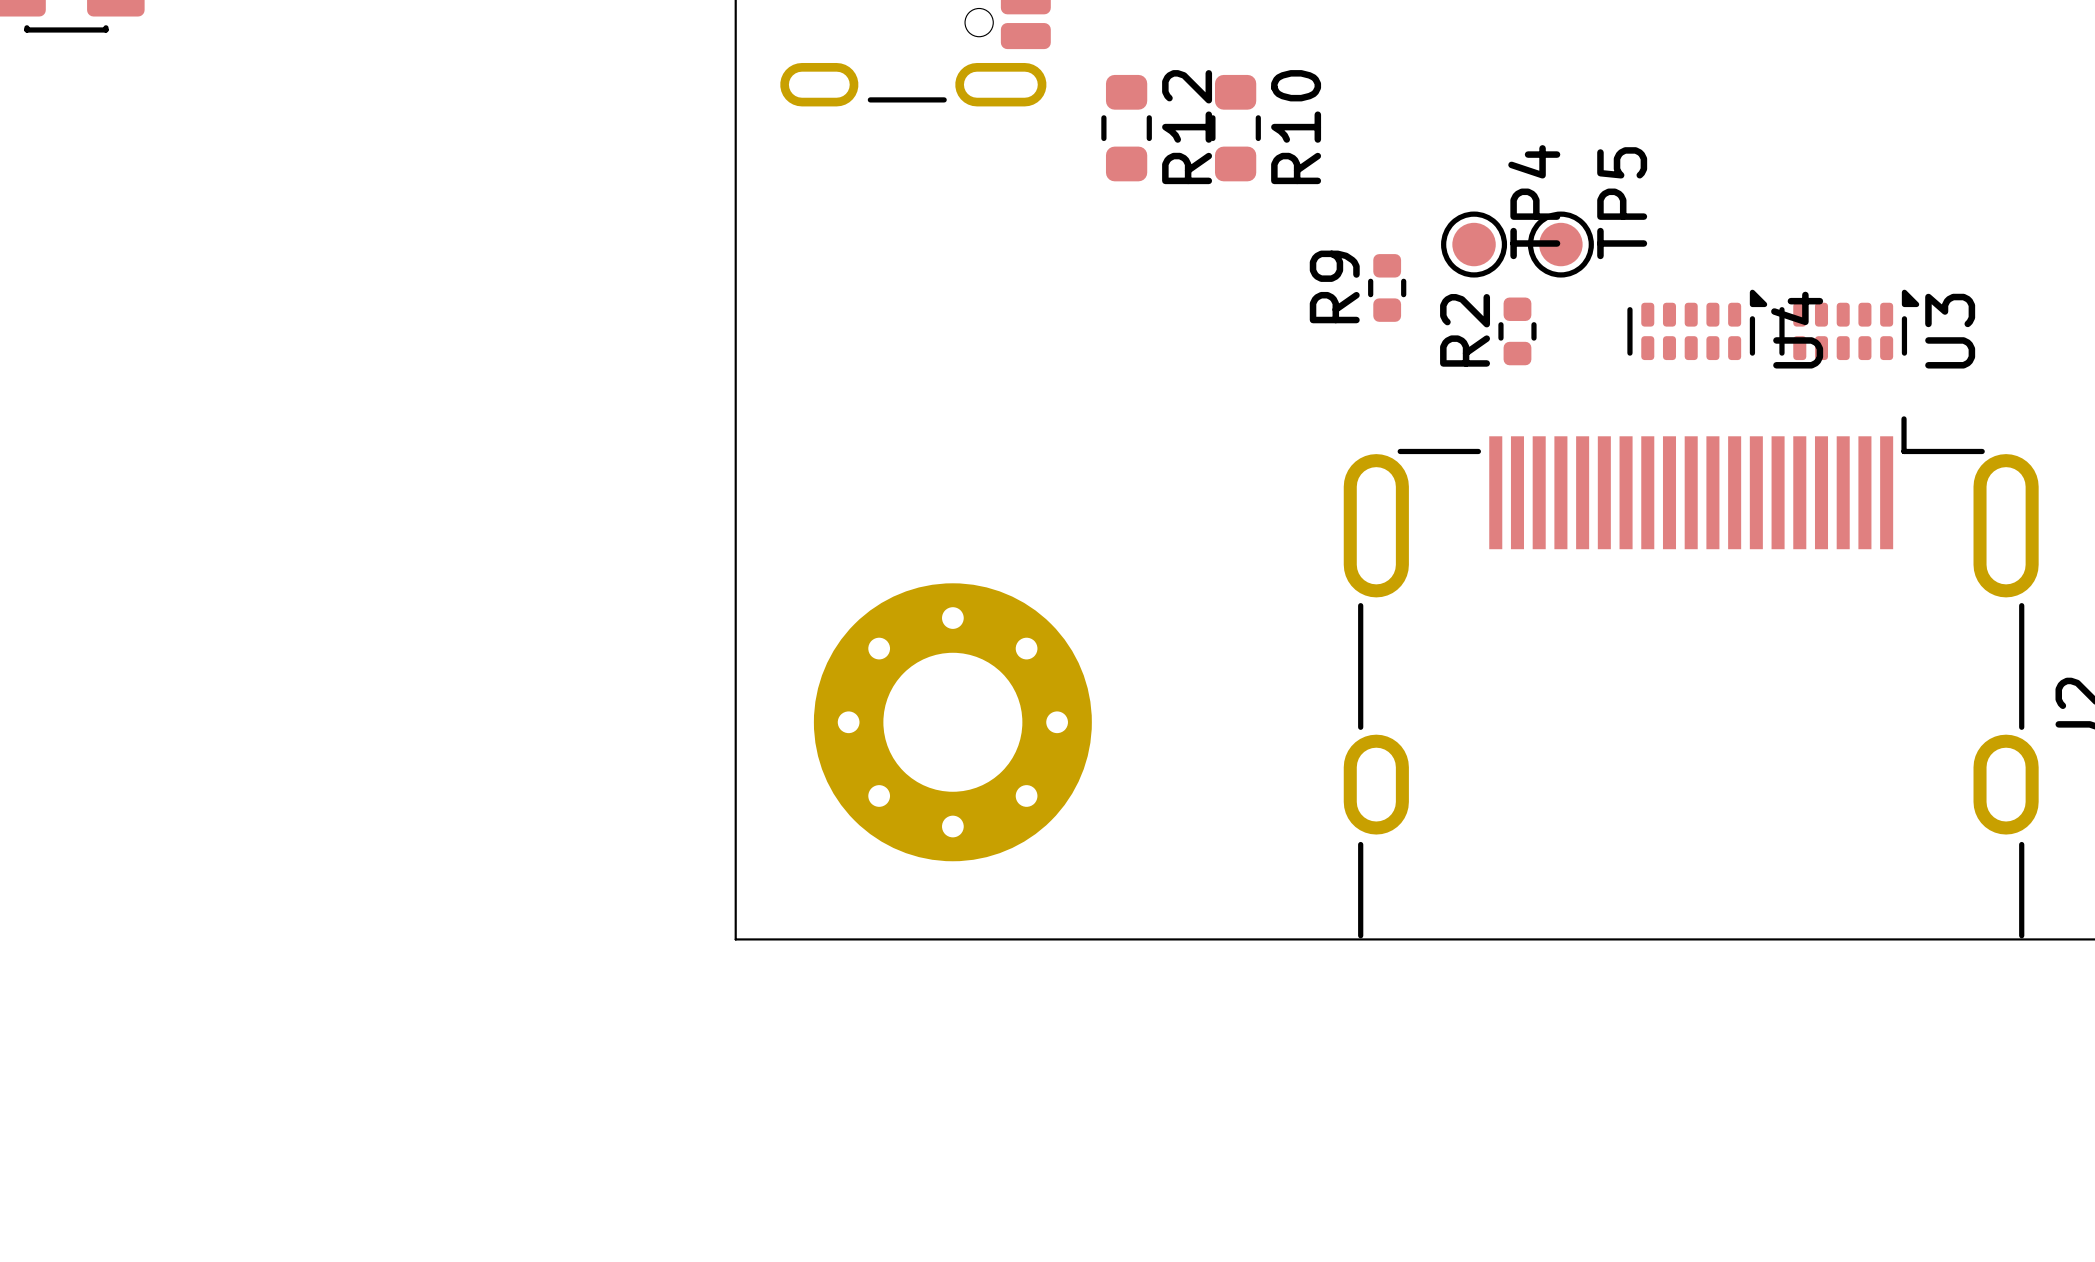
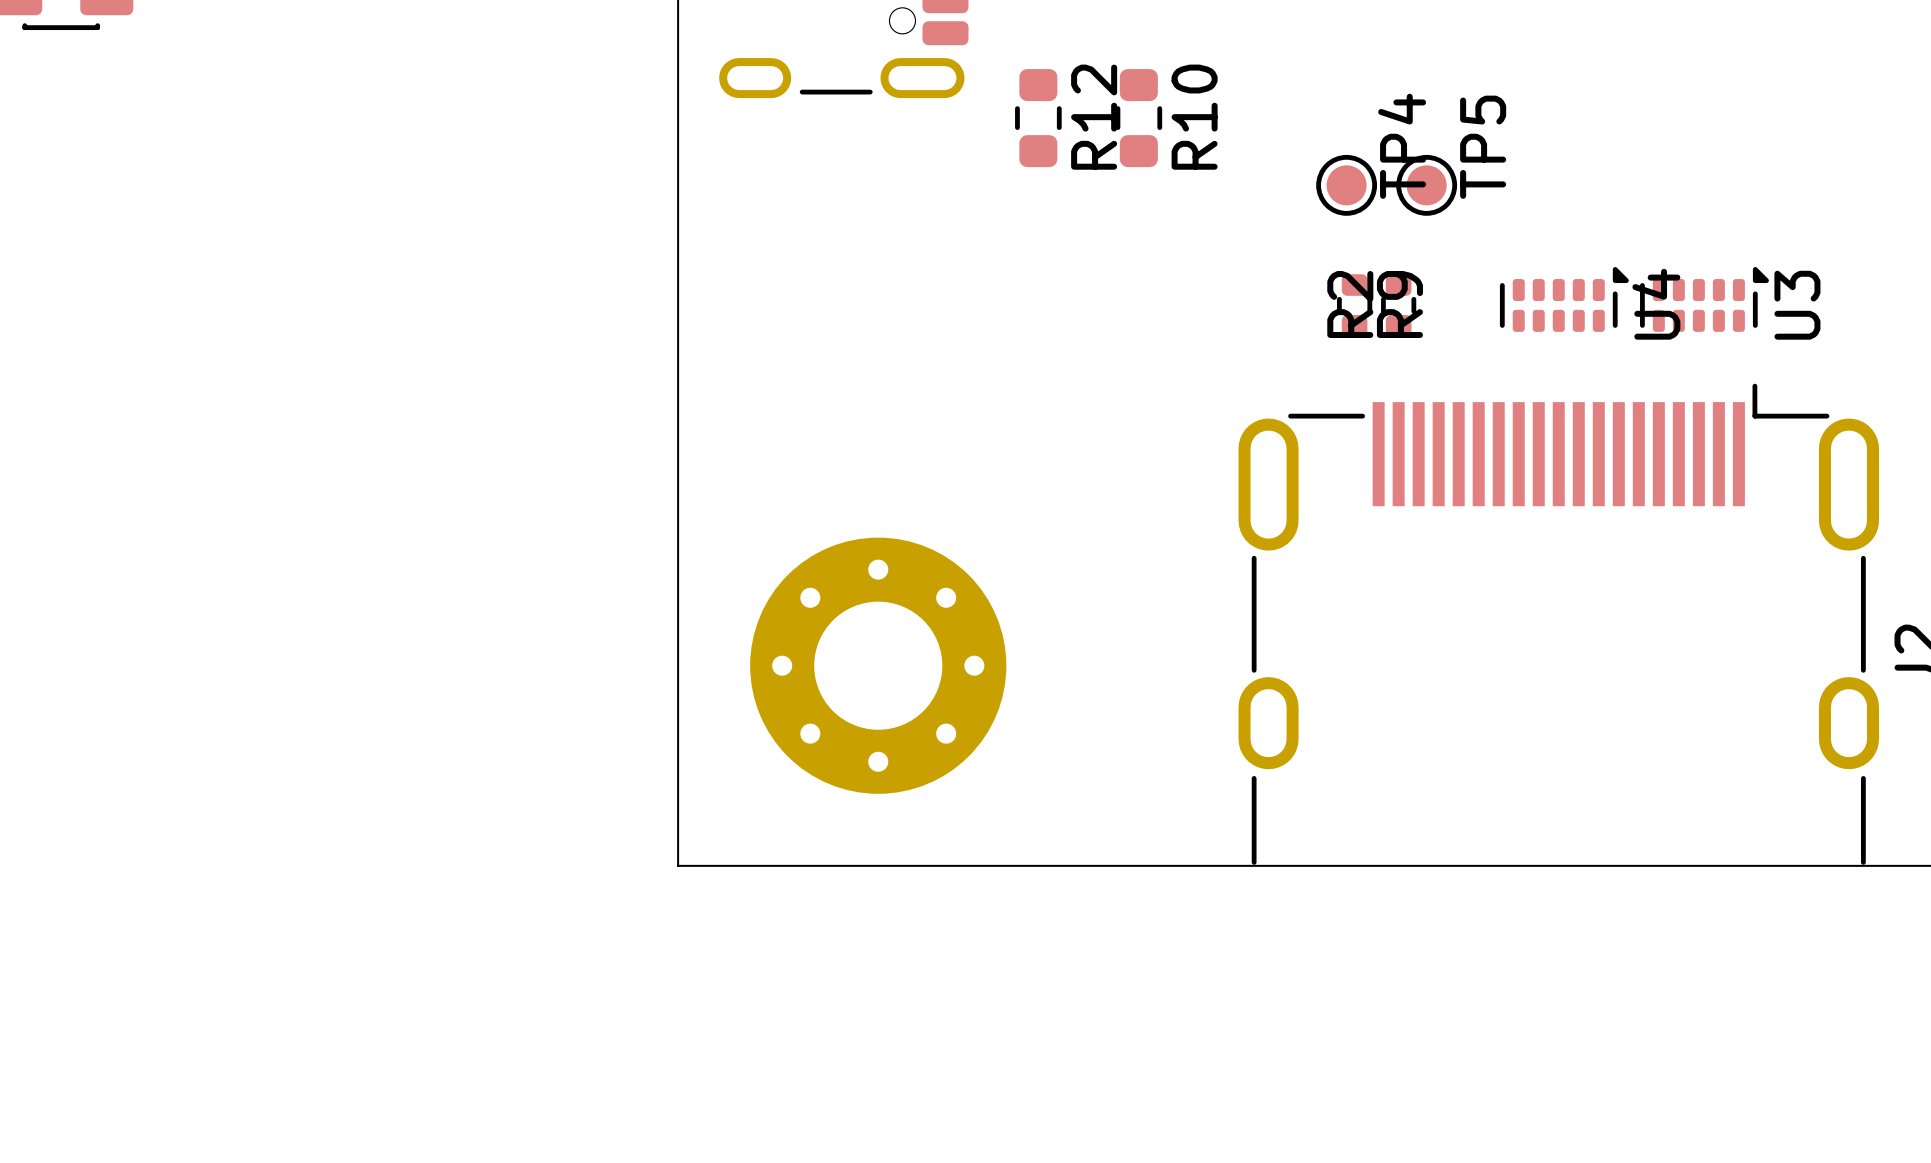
TP4 position: (1474, 244) -> (1346, 185)
TP5 position: (1560, 244) -> (1426, 185)
R9 name position: R9 (1334, 286) -> R9 (1399, 304)
R9 position: (1387, 287) -> (1354, 305)

